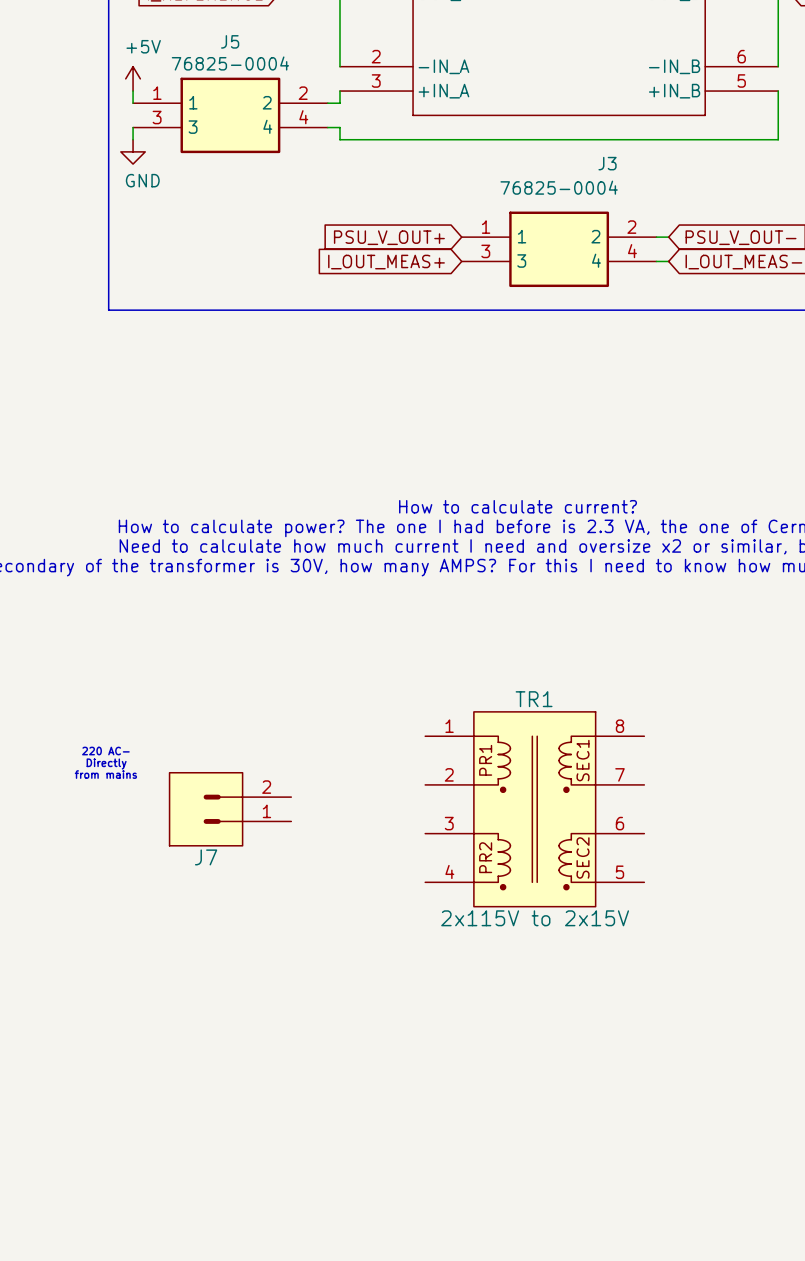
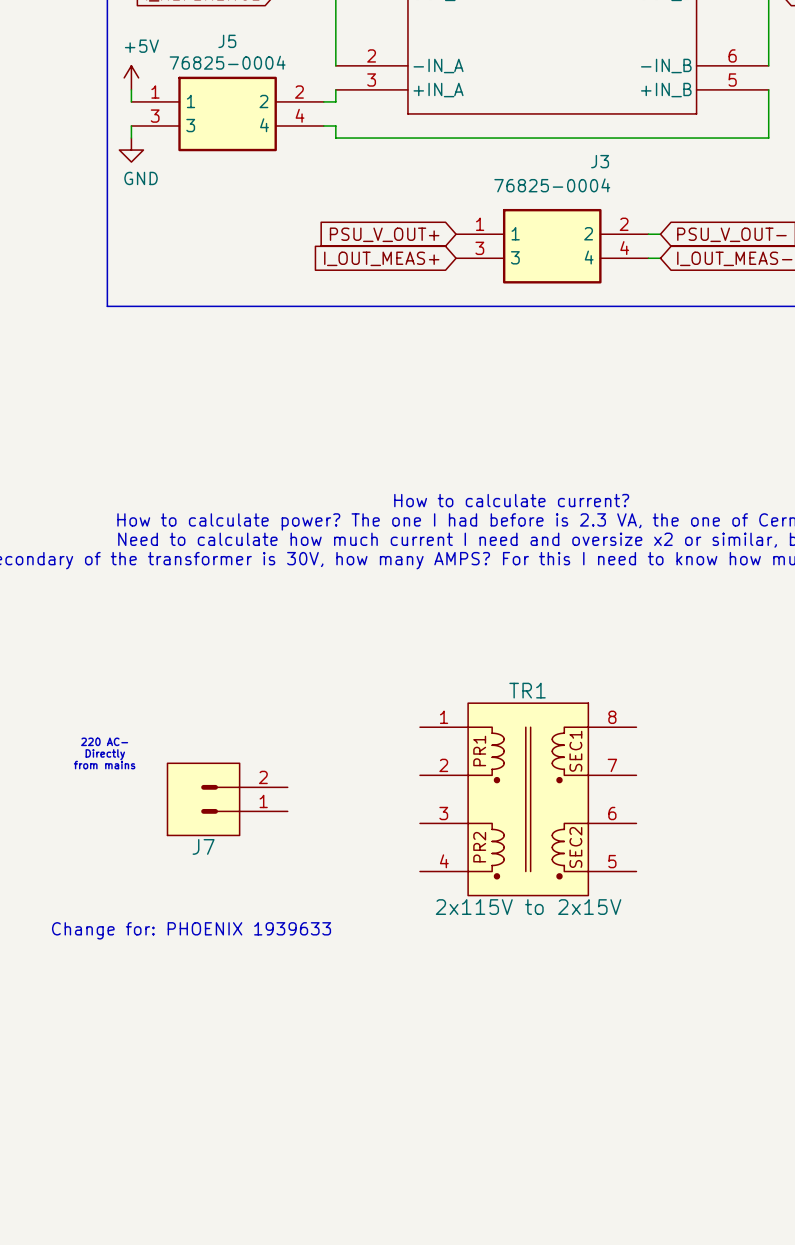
text: none -> Change for: PHOENIX 1939633 (191, 930)

